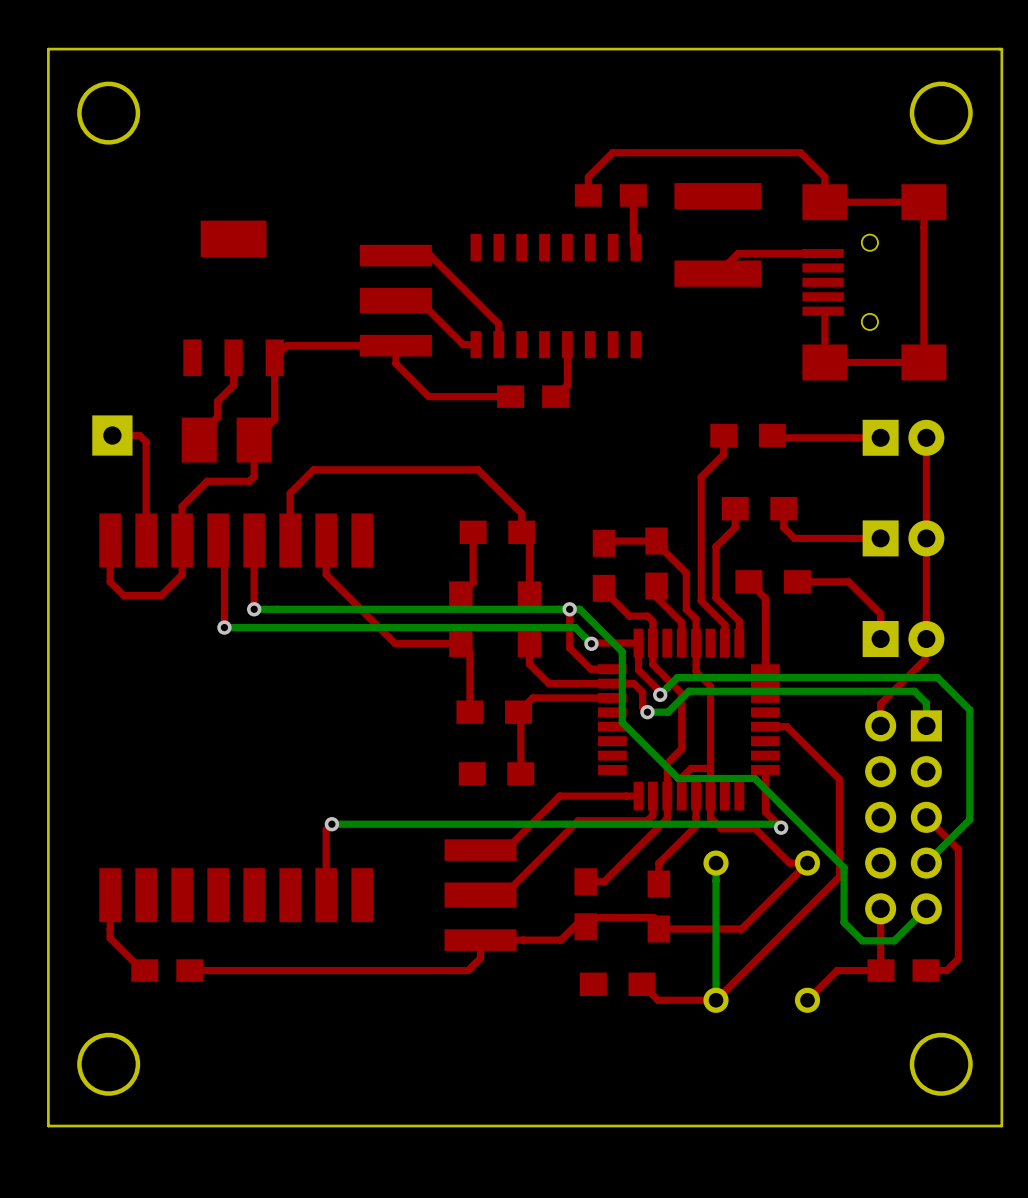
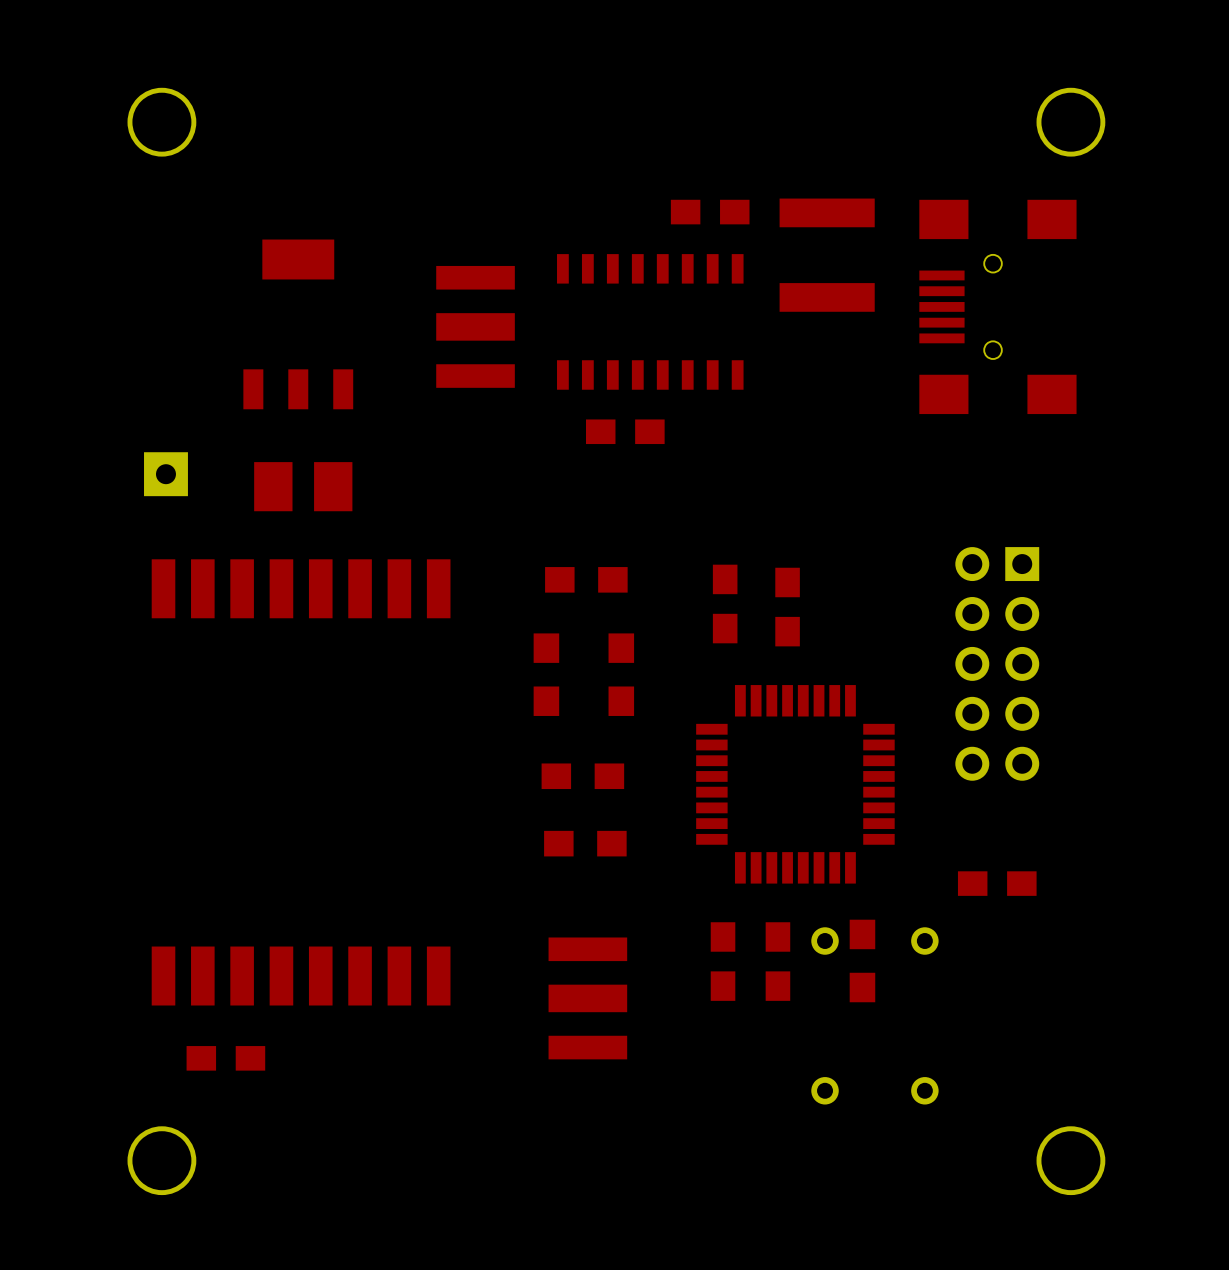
board edge: (1001, 49) (48, 49) (48, 1126) (1001, 1126) (1001, 49) -> none
top track: (588, 195) (588, 176) (612, 152) (800, 152) (824, 177) (824, 202) (923, 202) (923, 362) (824, 362) (824, 312) (823, 311) -> none
top track: (633, 195) (633, 244) (635, 247) -> none
top track: (823, 253) (738, 253) (717, 273) -> none
top track: (395, 255) (430, 255) (498, 323) (498, 344) -> none
top track: (395, 300) (419, 300) (463, 344) (475, 344) -> none
top track: (567, 344) (567, 384) (555, 396) -> none
top track: (233, 357) (233, 385) (217, 401) (217, 416) (199, 435) (199, 440) -> none
top track: (510, 396) (428, 396) (395, 363) (395, 345) (286, 345) (274, 357) (274, 419) (254, 440) (254, 476) (249, 481) (207, 481) (182, 506) (182, 574) (161, 595) (123, 595) (110, 581) (110, 540) -> none
top track: (112, 435) (139, 435) (146, 441) (146, 540) -> none
top track: (723, 435) (723, 454) (701, 476) (701, 600) (724, 624) (724, 643) -> none
part: (748, 435) -> none
top track: (772, 435) (774, 437) (880, 437) -> none
part: (903, 437) -> none
top track: (926, 437) (924, 659) (880, 703) (880, 725) -> none
part position: (226, 440) -> (303, 486)
top track: (735, 508) (735, 527) (716, 546) (716, 597) (739, 621) (739, 643) -> none
part: (759, 508) -> none
top track: (783, 508) (783, 527) (794, 538) (880, 538) -> none
top track: (473, 532) (473, 582) (460, 594) -> none
part: (903, 538) -> none
top track: (218, 540) (224, 546) (224, 627) -> none
top track: (254, 540) (254, 609) -> none
top track: (290, 540) (290, 493) (313, 469) (478, 469) (521, 513) (521, 532) (529, 539) (529, 594) -> none
top track: (326, 540) (326, 574) (394, 643) (460, 643) (469, 652) (469, 712) -> none
top track: (603, 543) (606, 541) (656, 541) (656, 543) (686, 573) (686, 609) (696, 619) (696, 671) (710, 686) (710, 817) (721, 828) (755, 828) (789, 863) (807, 863) (741, 929) (658, 929) -> none
part: none -> (725, 603)
part: none -> (787, 607)
part: (656, 563) -> none
part: (603, 565) -> none
top track: (748, 581) (765, 598) (765, 669) -> none
part: (773, 581) -> none
top track: (797, 581) (848, 581) (880, 613) (880, 639) -> none
top track: (656, 586) (656, 597) (681, 622) (681, 643) -> none
top track: (603, 588) (603, 590) (629, 616) (647, 616) (652, 621) (652, 664) (681, 693) (681, 748) (667, 763) (667, 818) (604, 881) (585, 881) -> none
bottom track: (254, 609) (579, 609) (622, 651) (622, 722) (678, 778) (754, 778) (844, 867) (844, 922) (862, 940) (894, 940) (926, 908) -> none
via: (254, 609) -> none
top track: (569, 609) (569, 648) (590, 669) (612, 669) -> none
via: (569, 609) -> none
bottom track: (224, 627) (575, 627) (591, 643) -> none
via: (224, 627) -> none
part: (903, 639) -> none
top track: (529, 643) (529, 664) (548, 683) (634, 683) (642, 692) (642, 707) (647, 712) -> none
top track: (591, 643) (638, 643) (638, 669) (660, 691) (660, 694) -> none
via: (591, 643) -> none
bottom track: (660, 694) (677, 677) (937, 677) (969, 709) (969, 819) (926, 863) -> none
via: (660, 694) -> none
top track: (612, 697) (532, 697) (518, 712) (520, 714) (520, 773) -> none
bottom track: (647, 712) (668, 712) (688, 691) (914, 691) (926, 703) (926, 725) -> none
via: (647, 712) -> none
top track: (765, 726) (787, 726) (839, 779) (839, 876) (716, 1000) (658, 1000) (642, 984) -> none
top track: (710, 768) (691, 768) (681, 777) (681, 796) -> none
top track: (765, 769) (765, 812) (781, 827) -> none
top track: (638, 796) (559, 796) (505, 850) (480, 850) -> none
top track: (652, 796) (652, 815) (647, 820) (578, 820) (503, 895) (480, 895) -> none
top track: (696, 796) (696, 826) (658, 863) (658, 884) -> none
part: none -> (997, 883)
part position: (903, 817) -> (997, 663)
top track: (926, 817) (958, 849) (958, 958) (946, 970) (926, 970) -> none
top track: (331, 824) (326, 829) (326, 895) -> none
bottom track: (331, 824) (777, 824) (781, 827) -> none
via: (331, 824) -> none
via: (781, 827) -> none
bottom track: (716, 863) (716, 1000) -> none
part: none -> (723, 961)
part: none -> (777, 961)
part: none -> (862, 960)
top track: (110, 895) (110, 938) (142, 970) (144, 970) -> none
part position: (480, 895) -> (587, 998)
part: (585, 904) -> none
part: (658, 906) -> none
top track: (880, 908) (881, 970) (837, 970) (807, 1000) -> none
top track: (654, 917) (581, 917) (581, 919) (560, 940) (480, 940) (480, 958) (468, 970) (189, 970) -> none
part: (903, 970) -> none
part: (617, 984) -> none

